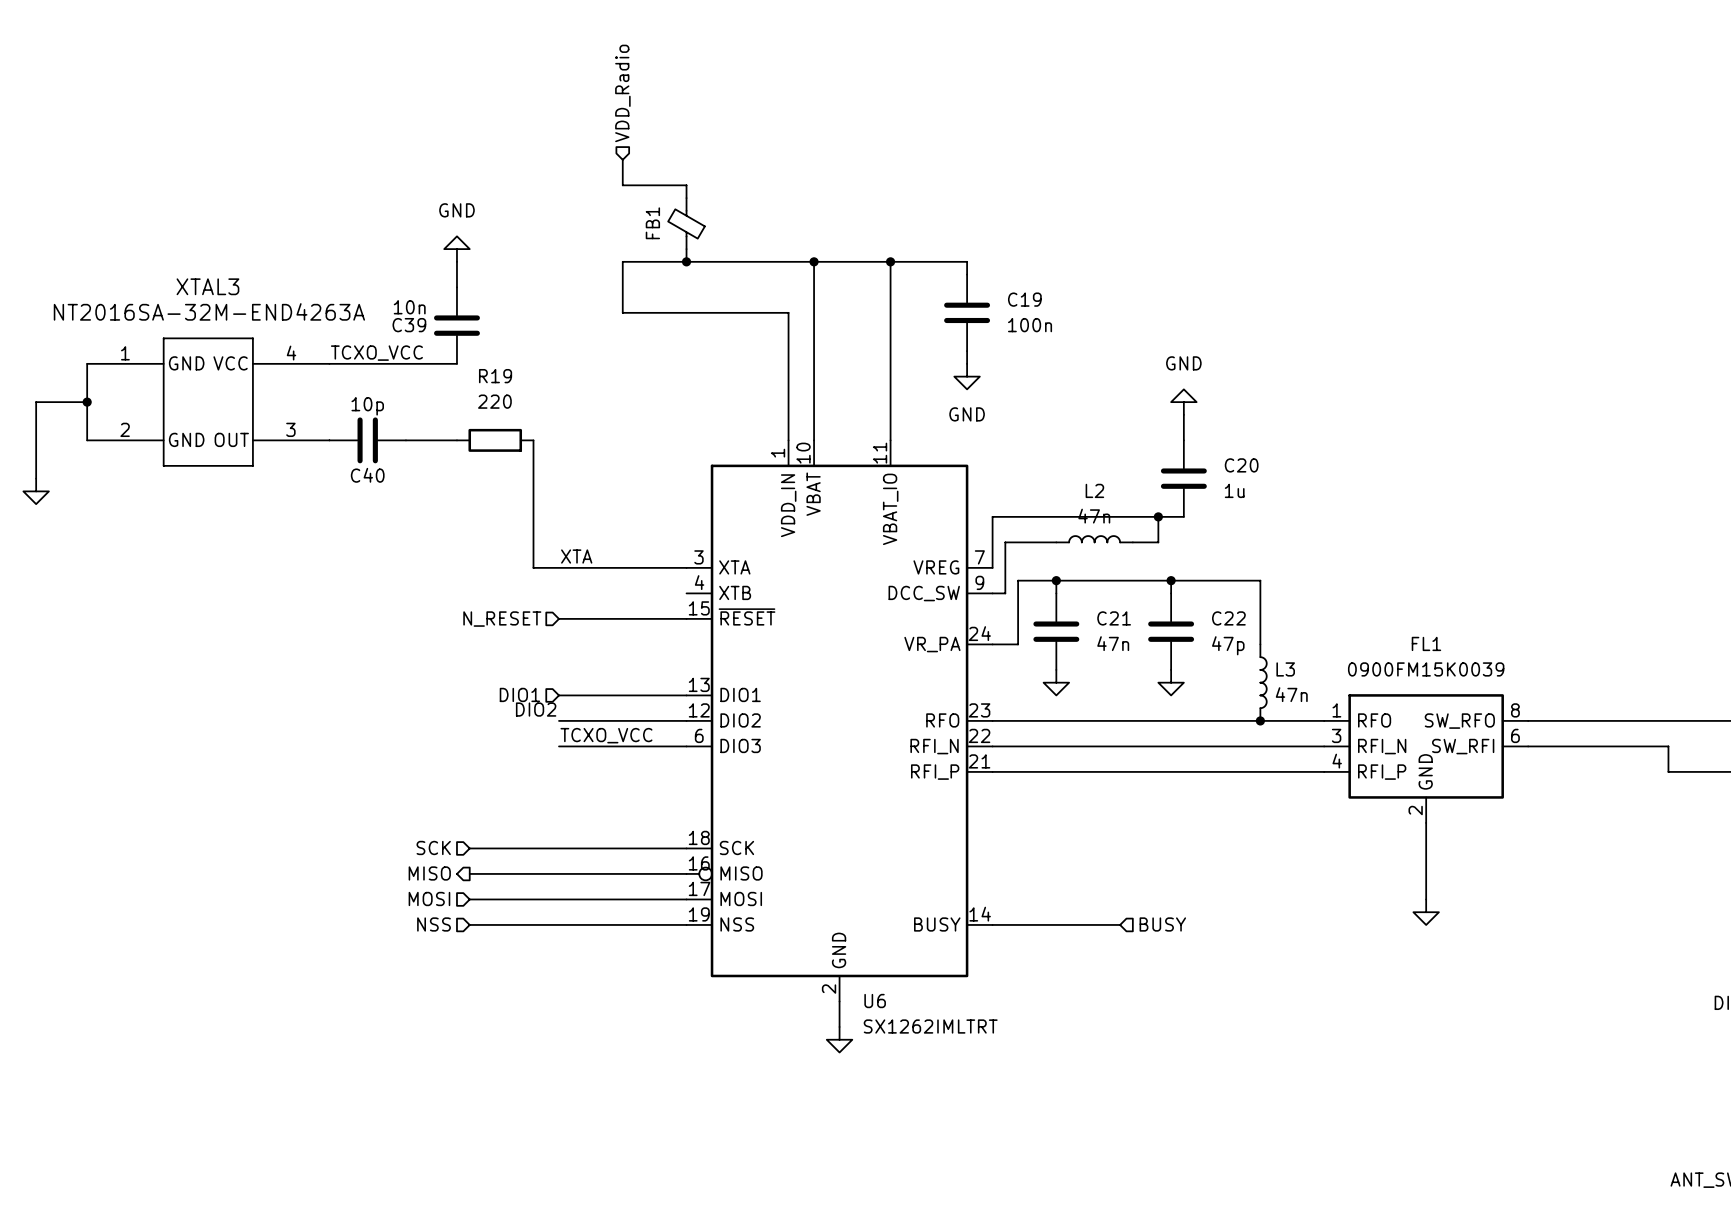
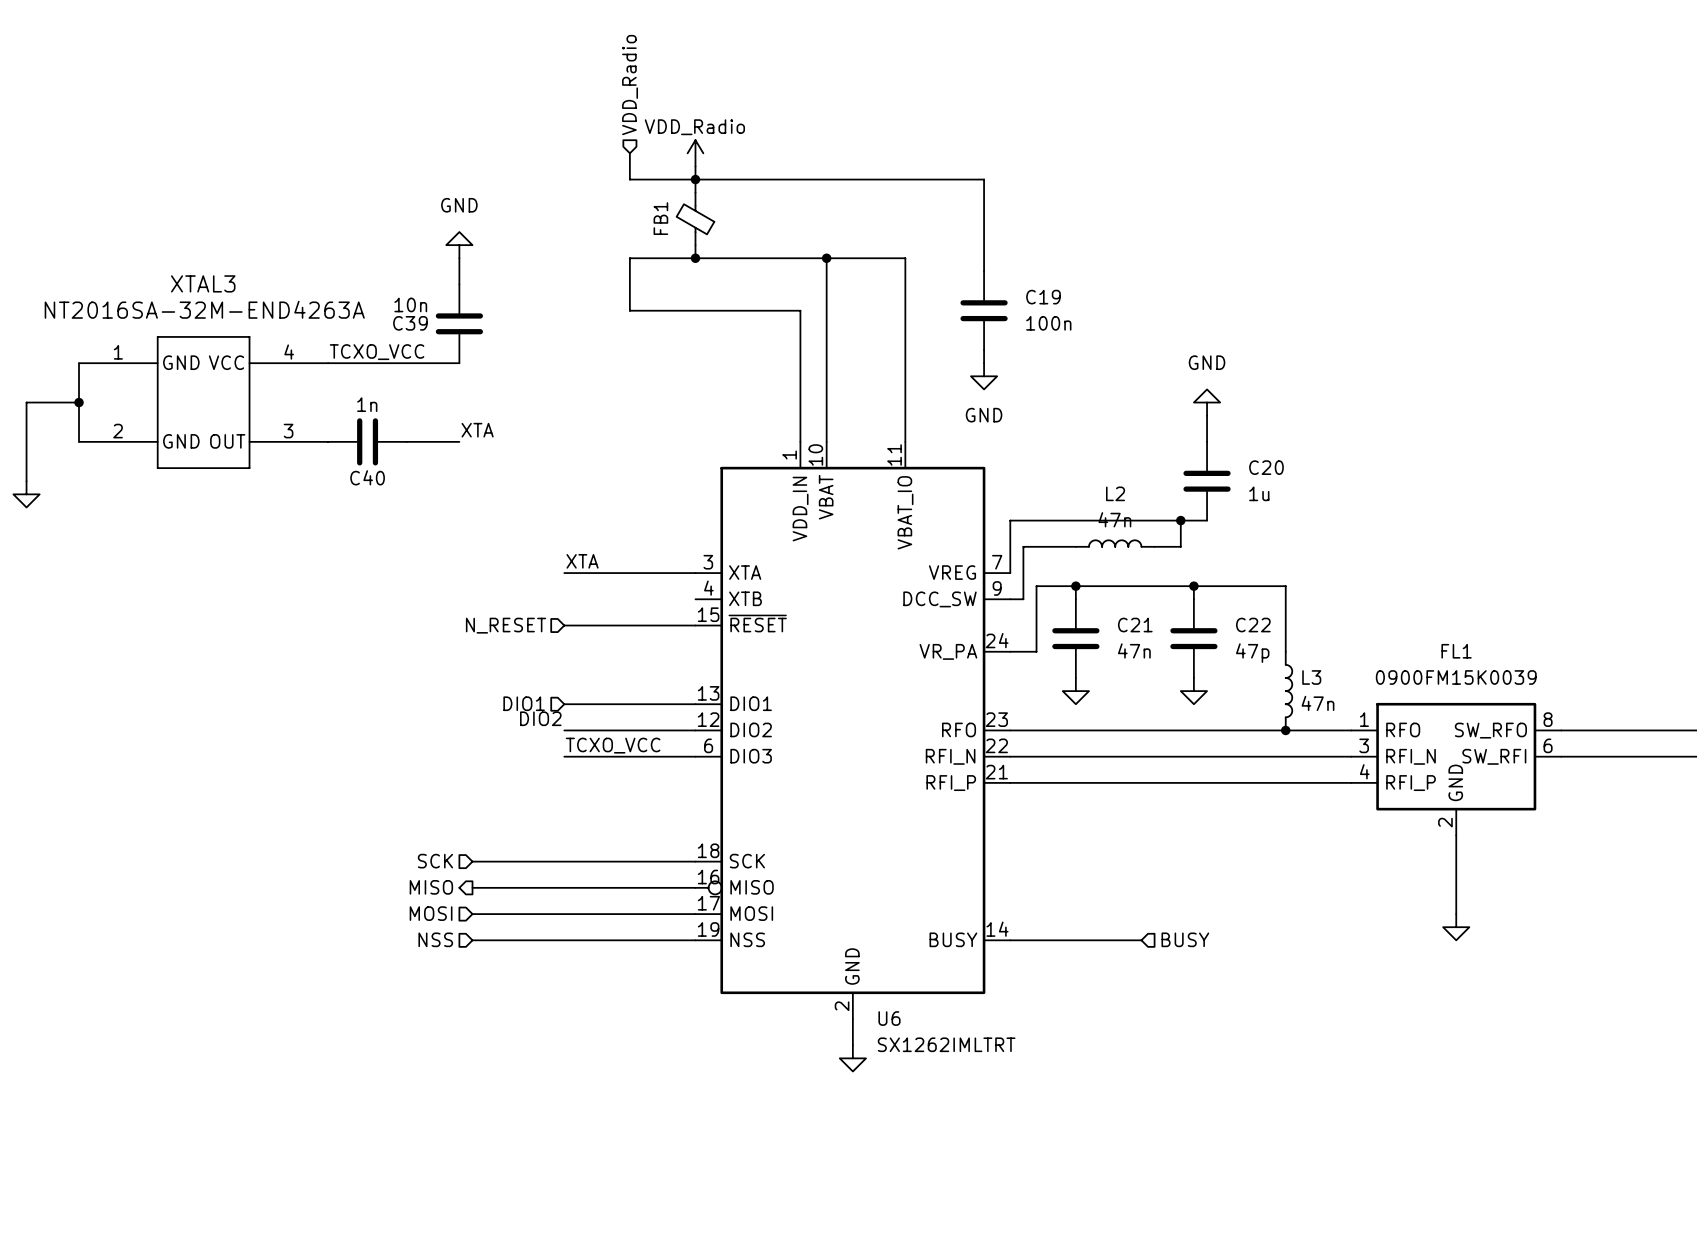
power symbol: none -> VDD_Radio (695, 153)
junction: none -> (695, 179)
wire: (890, 261) (967, 261) -> (695, 166) (695, 179) (984, 179) (984, 258)
junction: (890, 261) -> none
C40 value: 10p (367, 406) -> 1n (367, 404)
label: none -> XTA (477, 430)
R19: 220 (495, 440) -> none
wire: (533, 440) (533, 567) (559, 567) -> none

